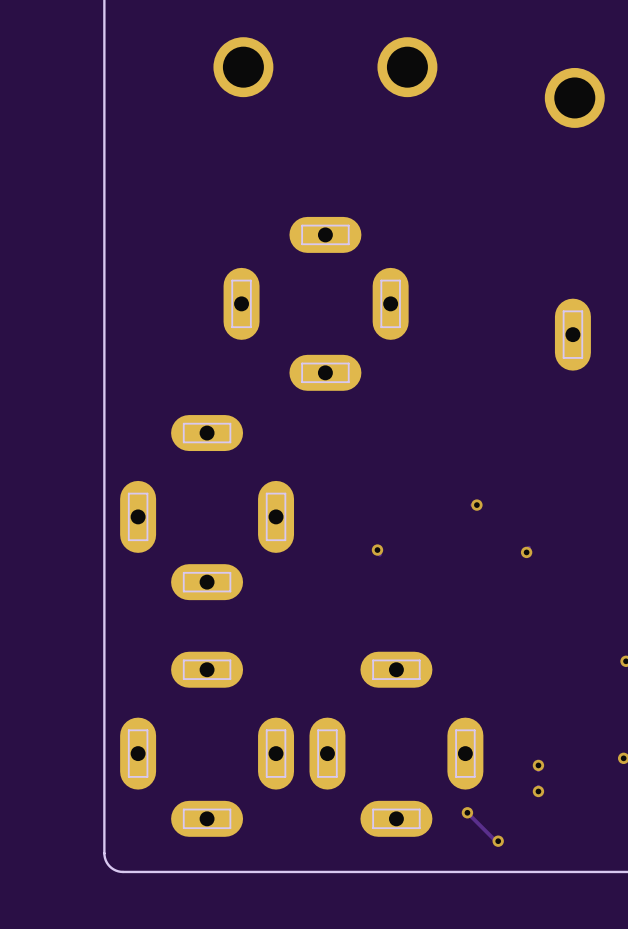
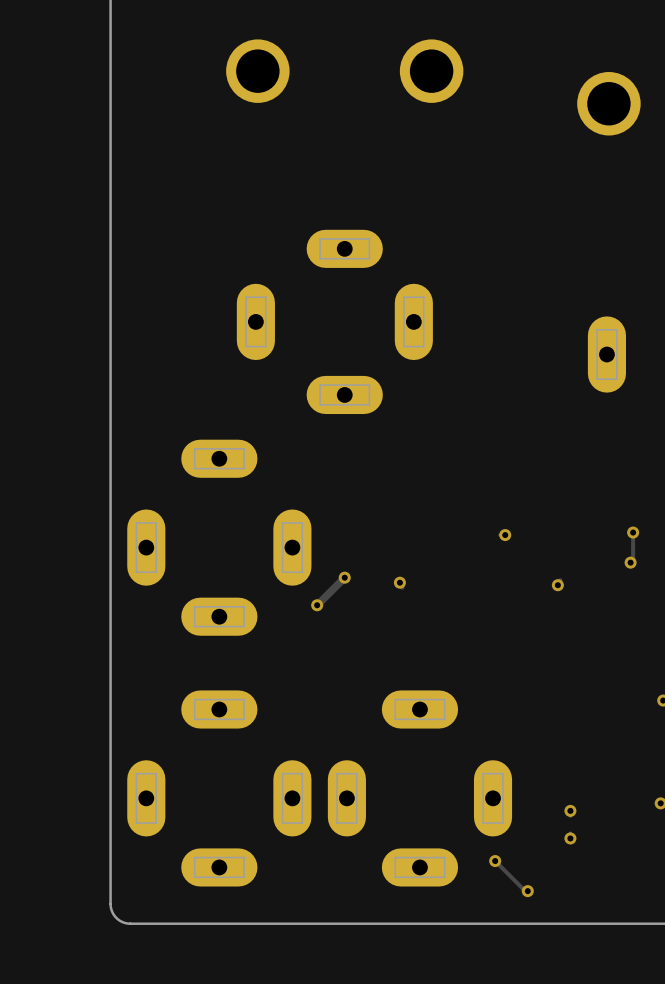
track: none -> (633, 532) (633, 560) (630, 562)
via: none -> (633, 532)
via: none -> (630, 562)
track: none -> (344, 577) (317, 605)
via: none -> (344, 577)
via: none -> (317, 605)

